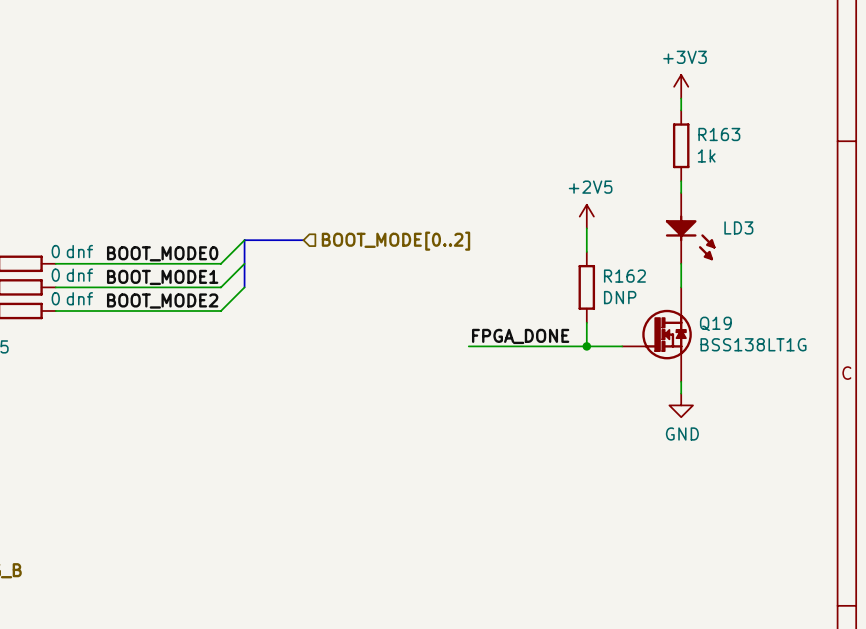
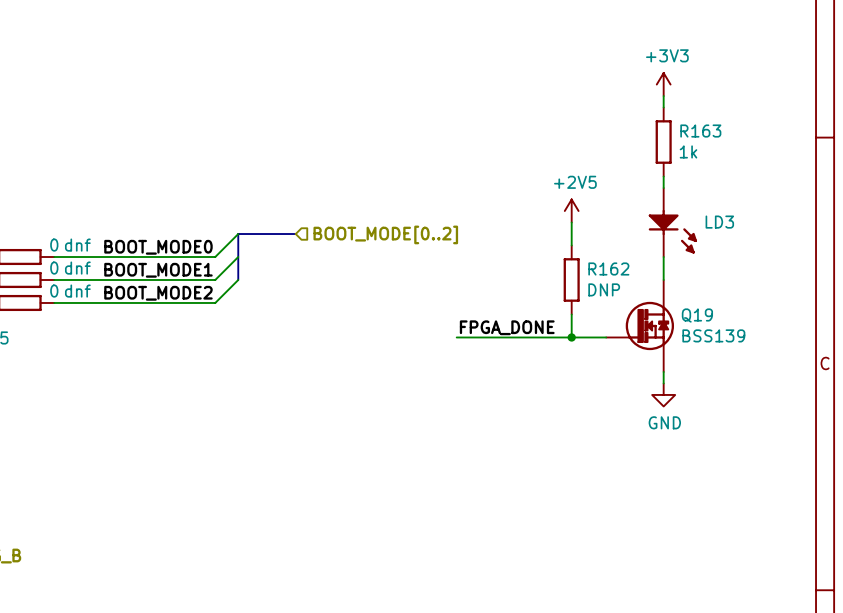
Q19 value: BSS138LT1G (753, 344) -> BSS139 (713, 335)

